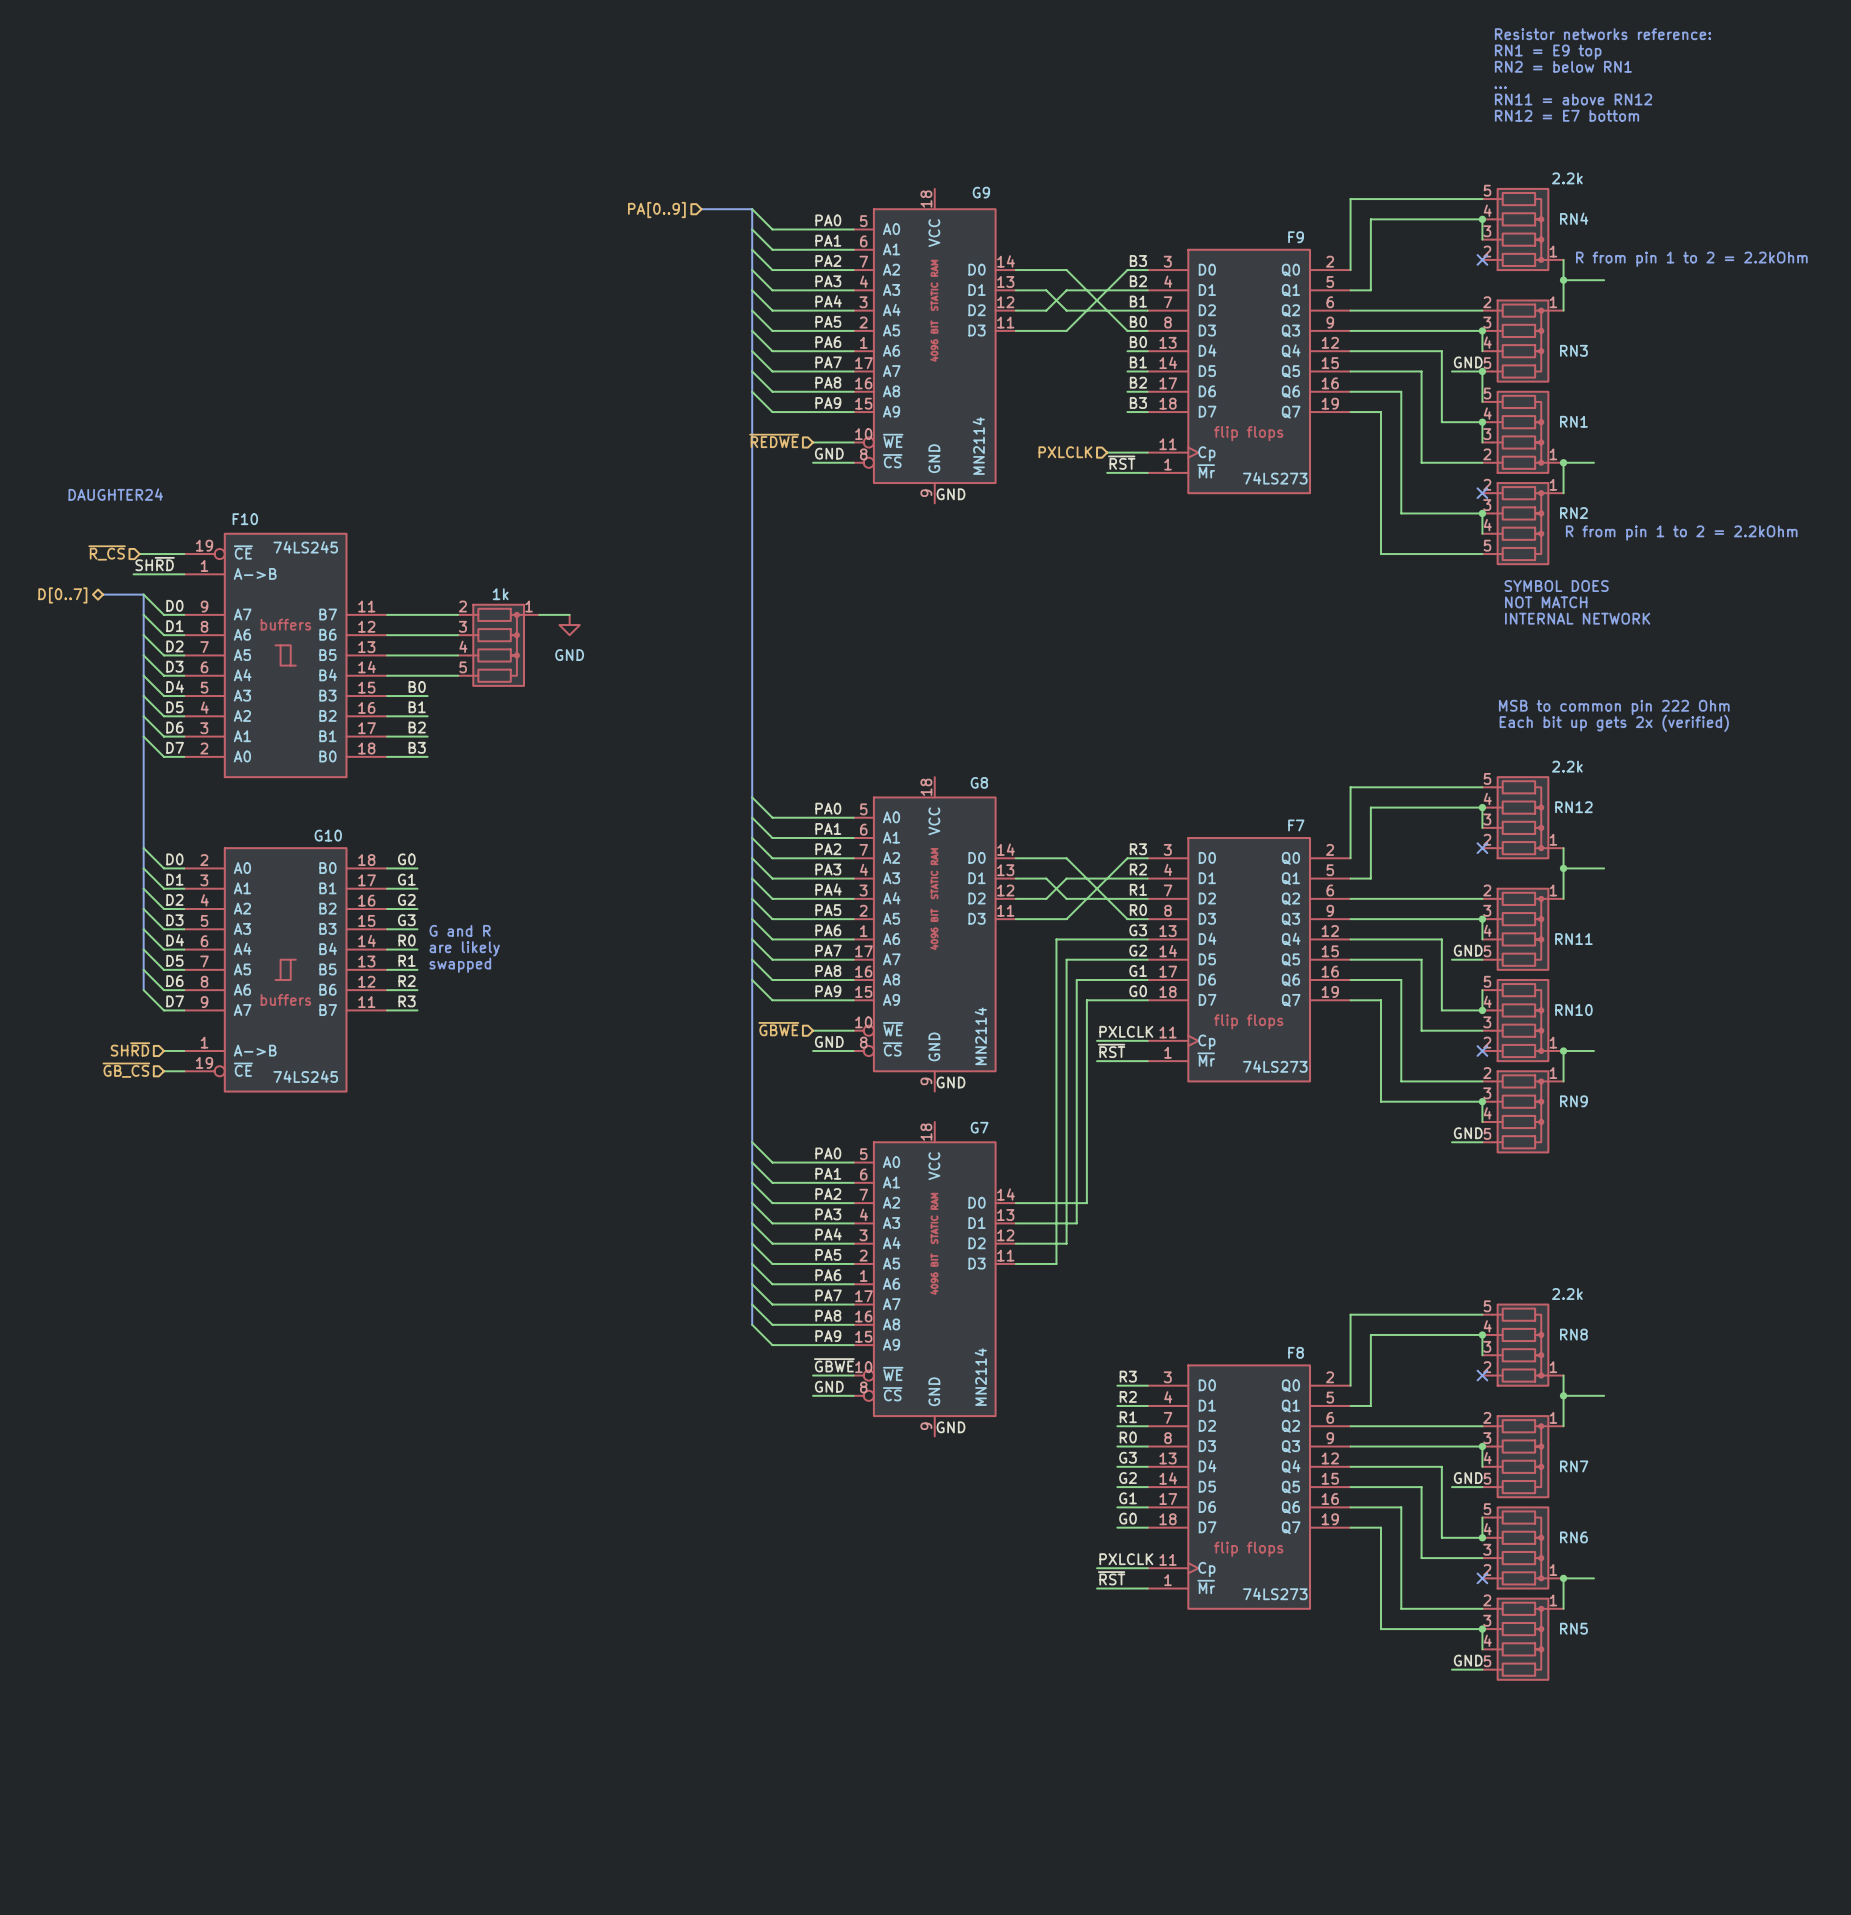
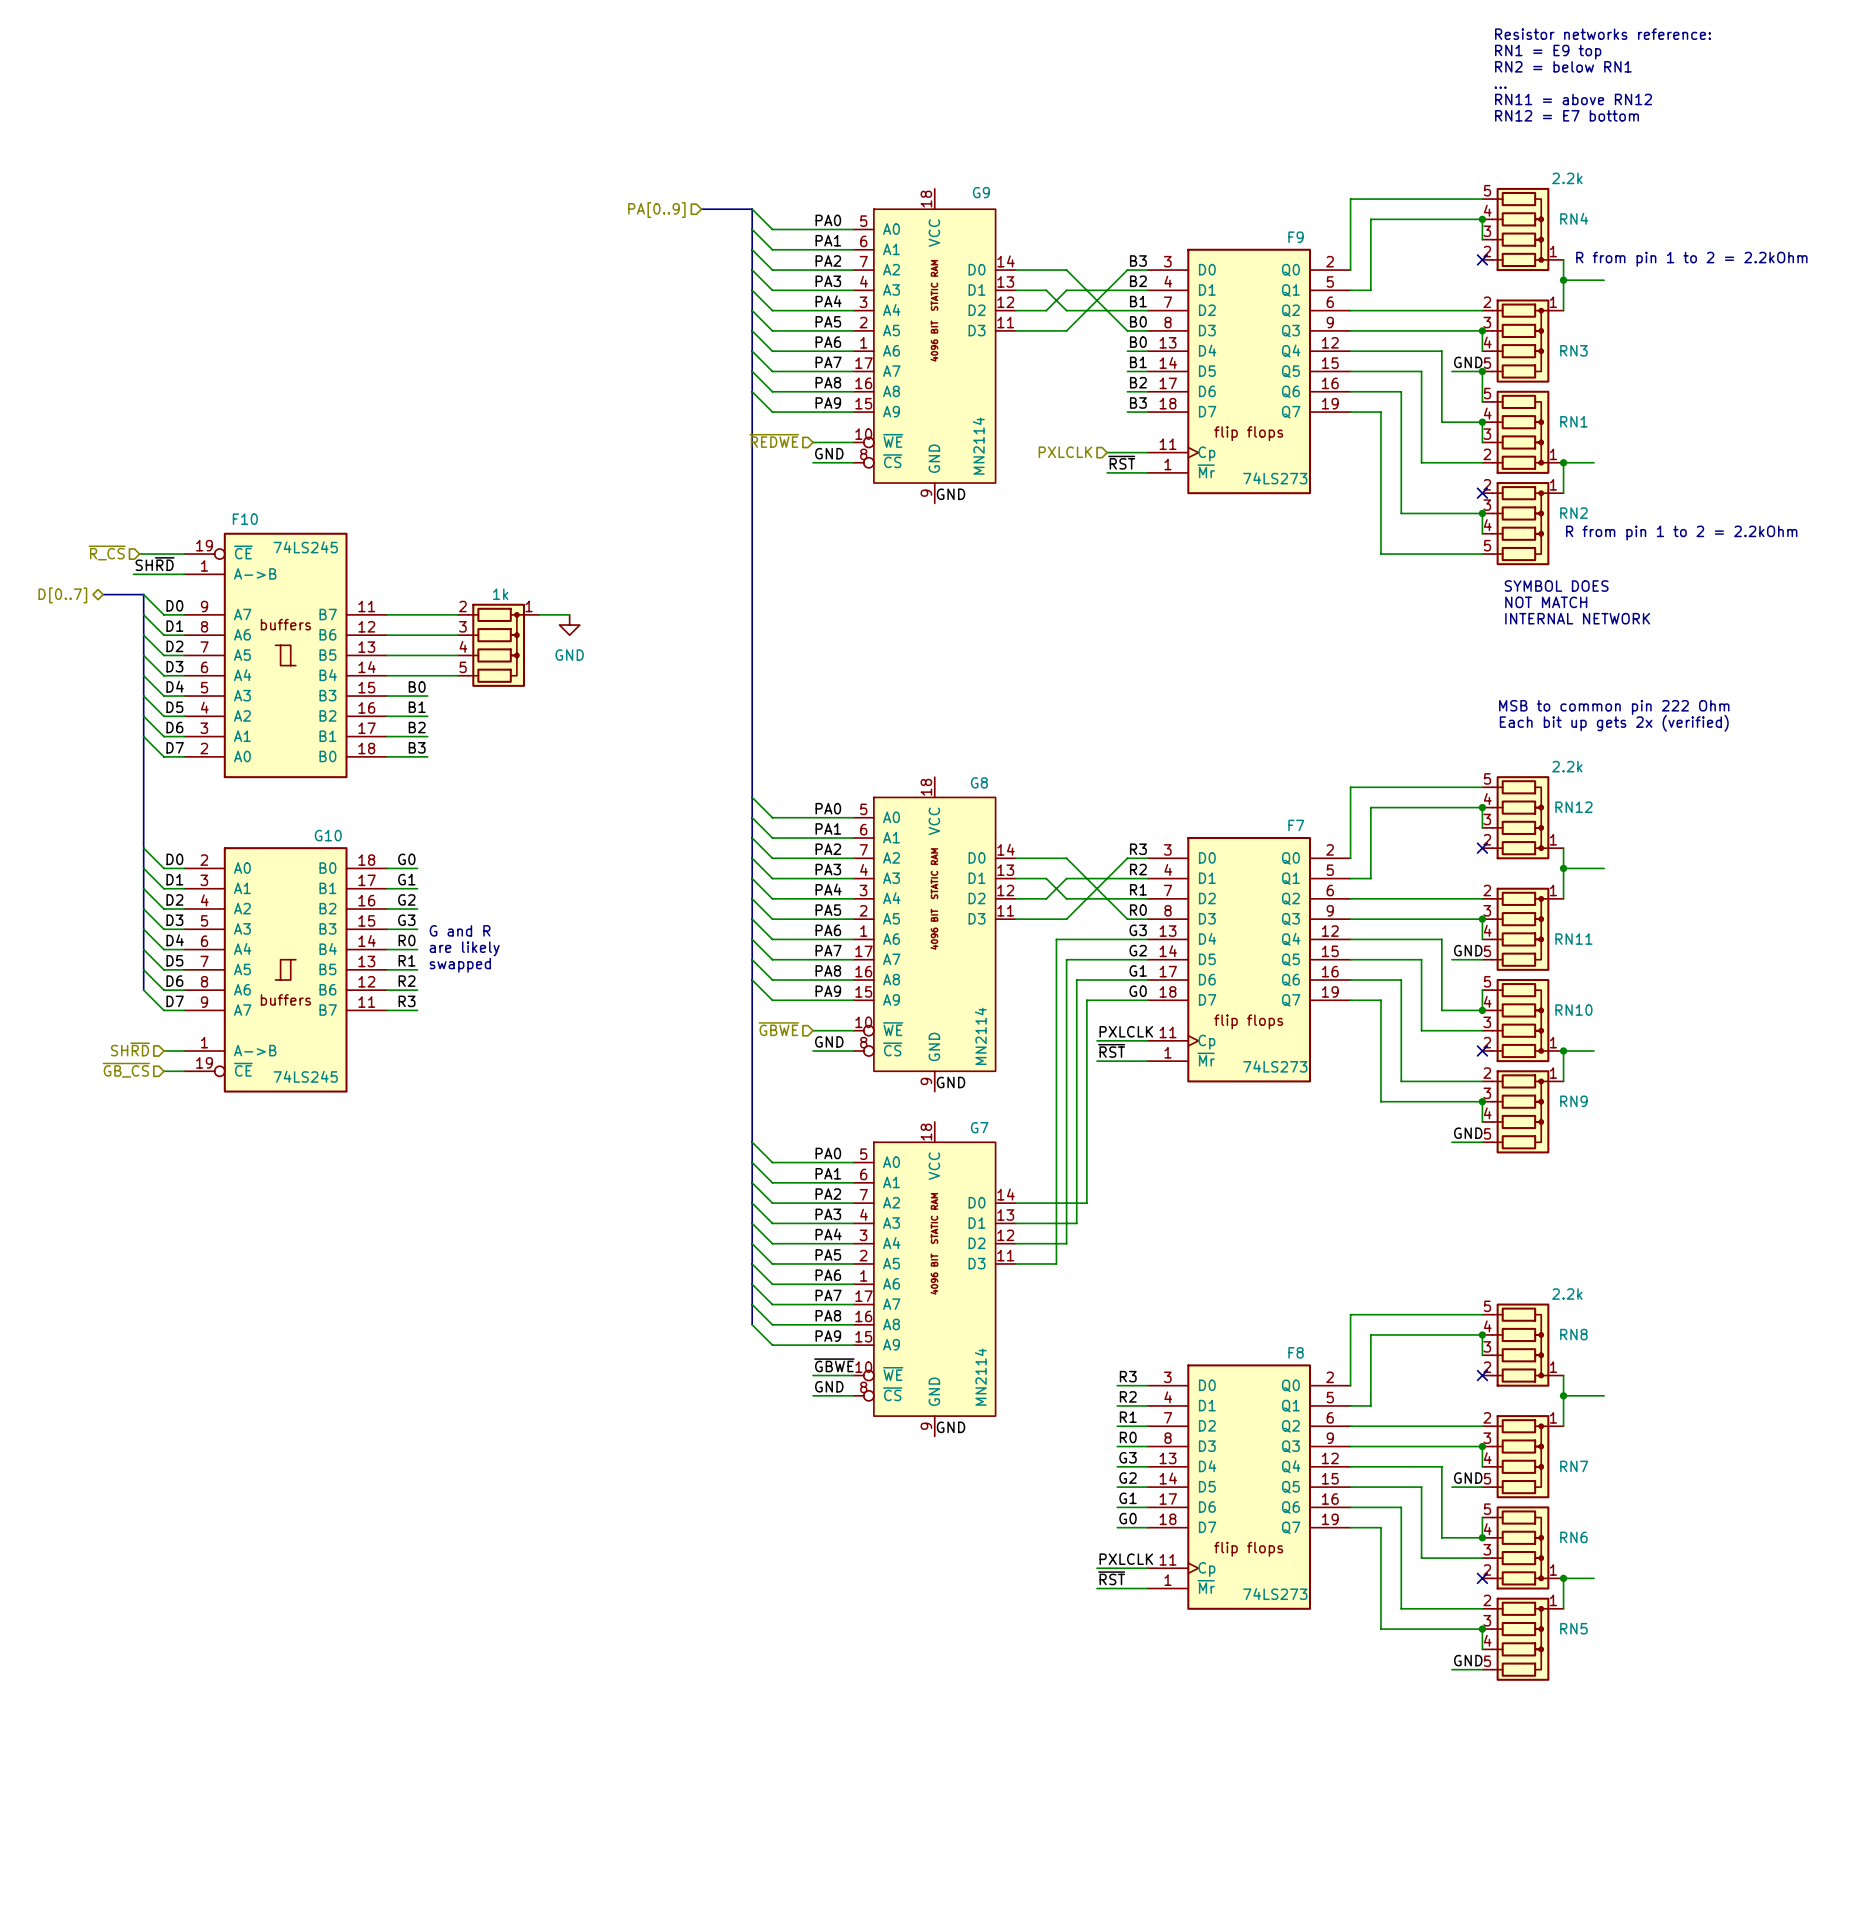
text: DAUGHTER24 (115, 494) -> none

